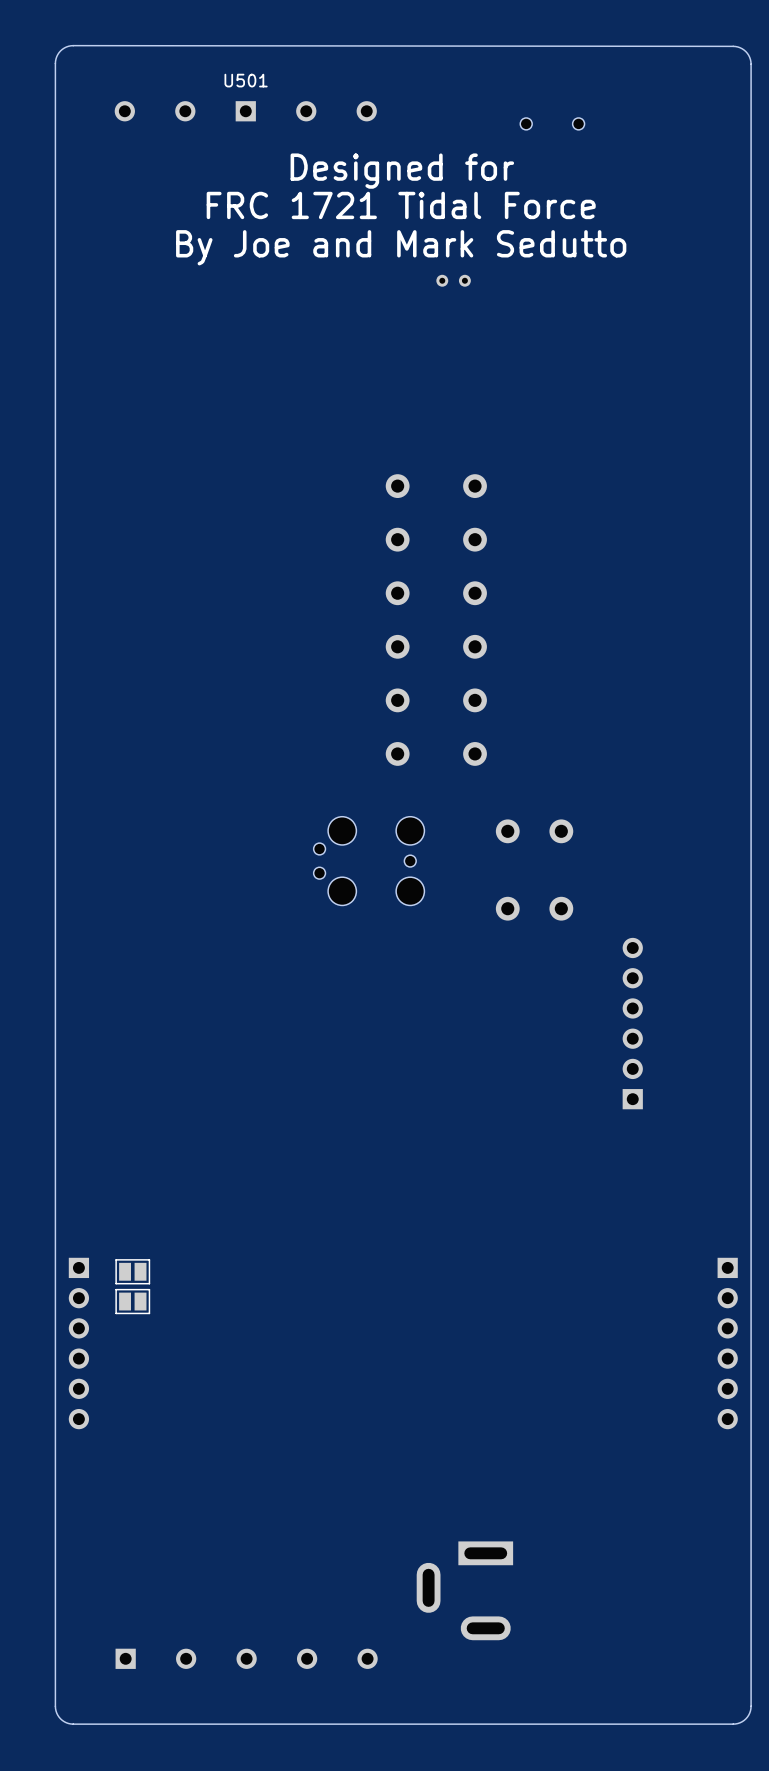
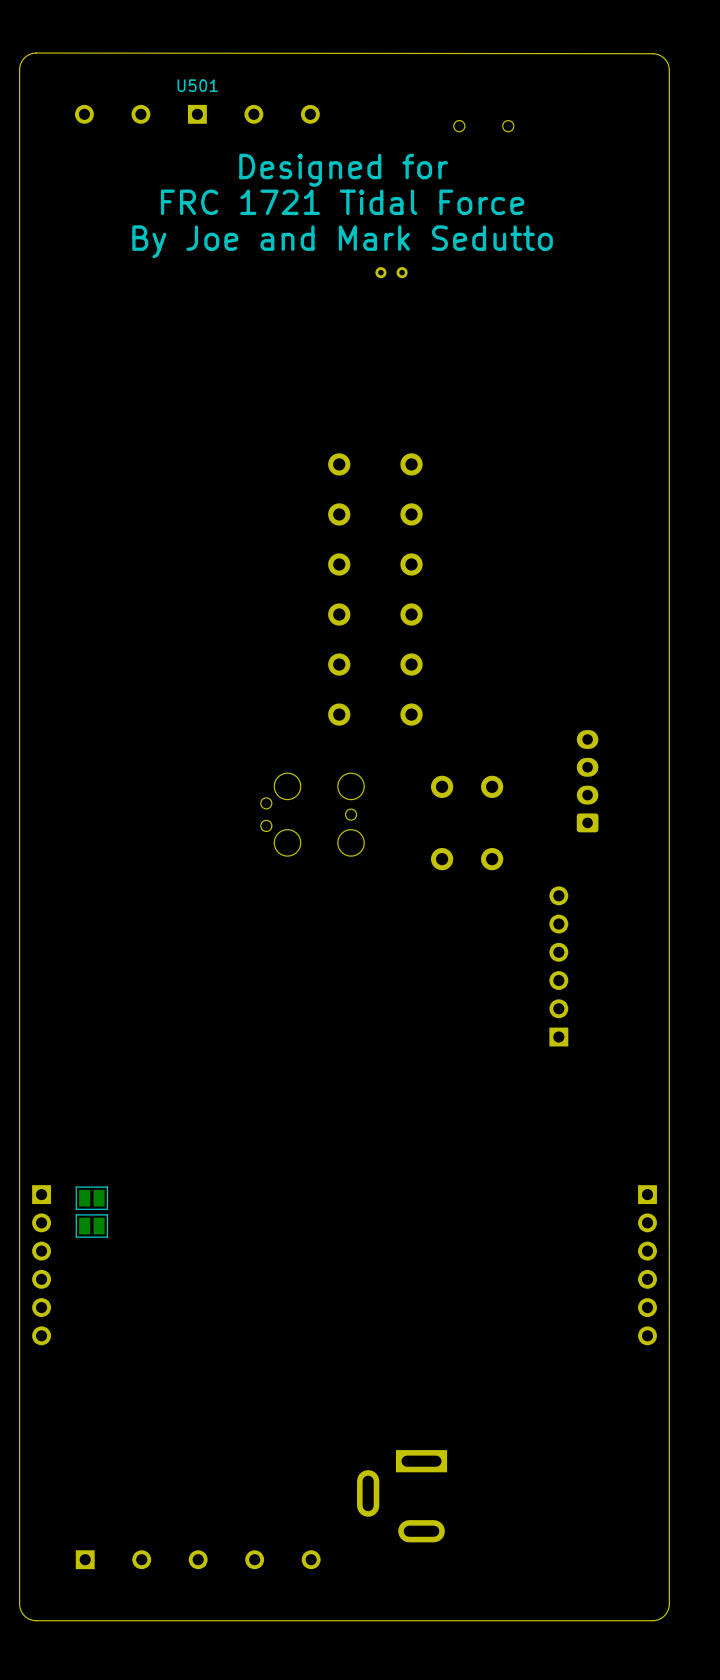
part: none -> (587, 781)

